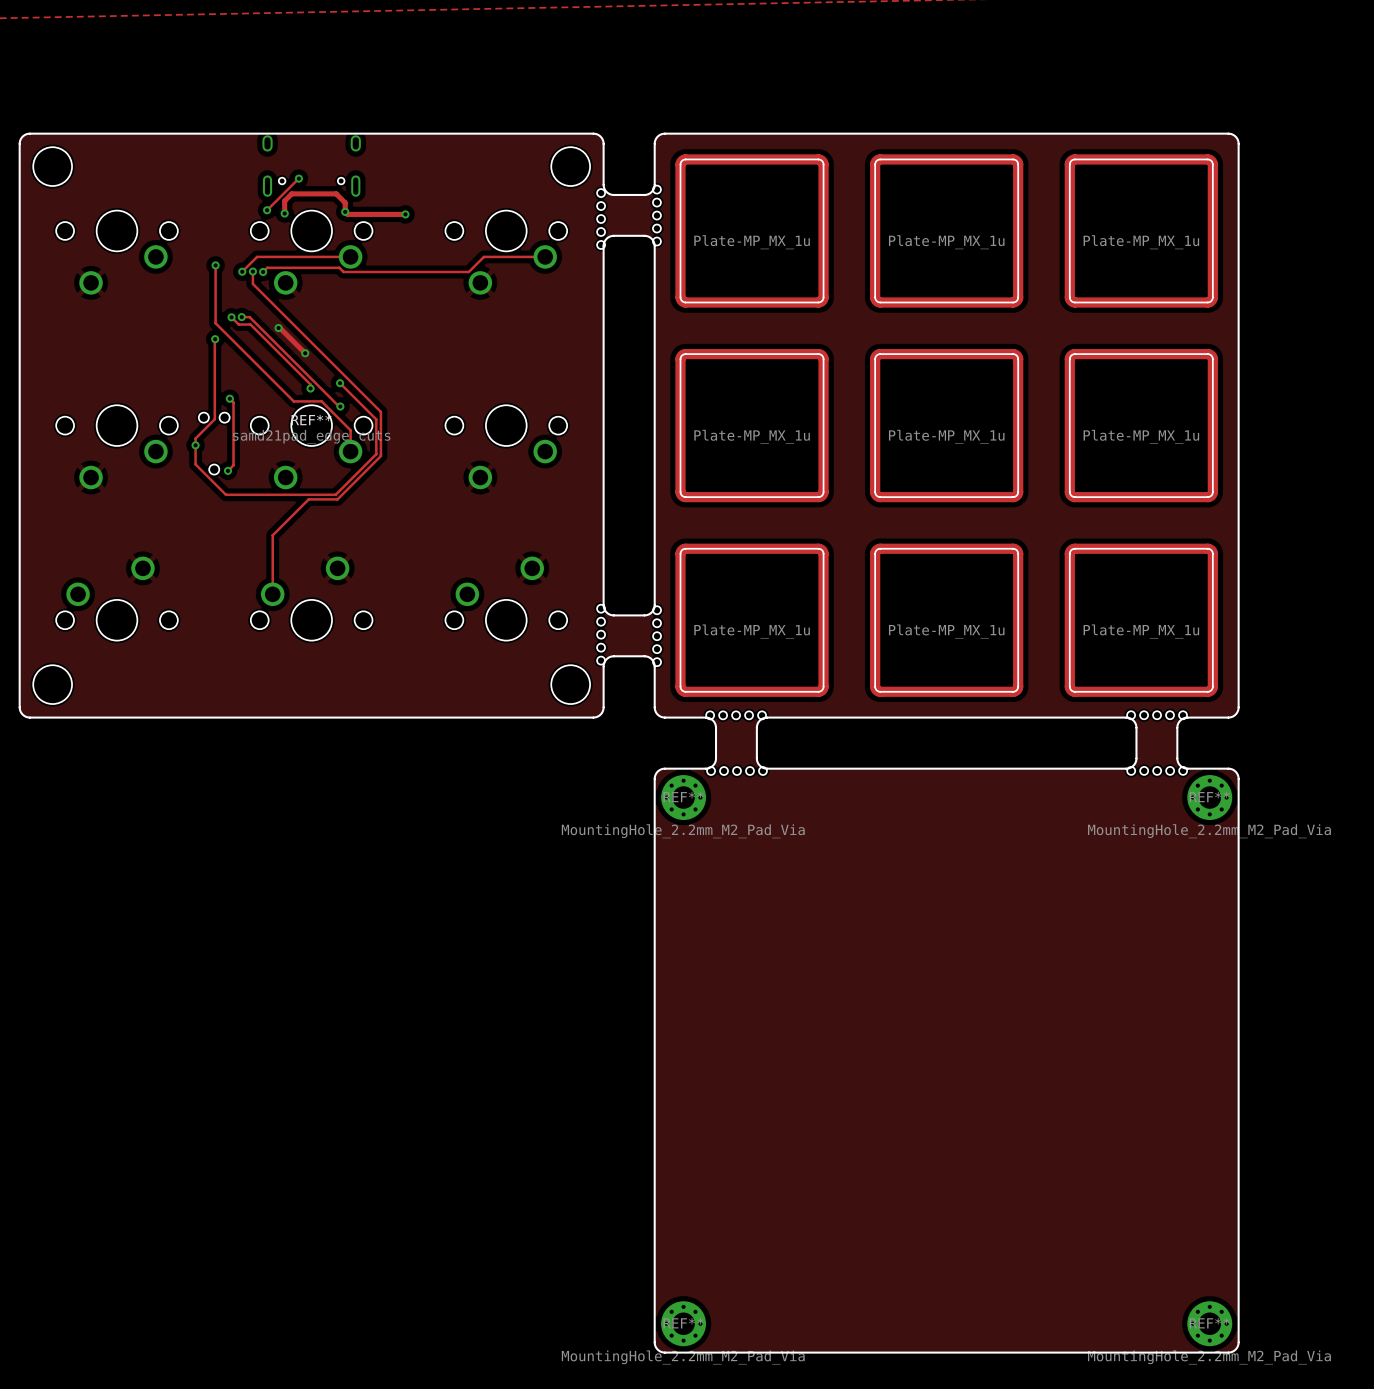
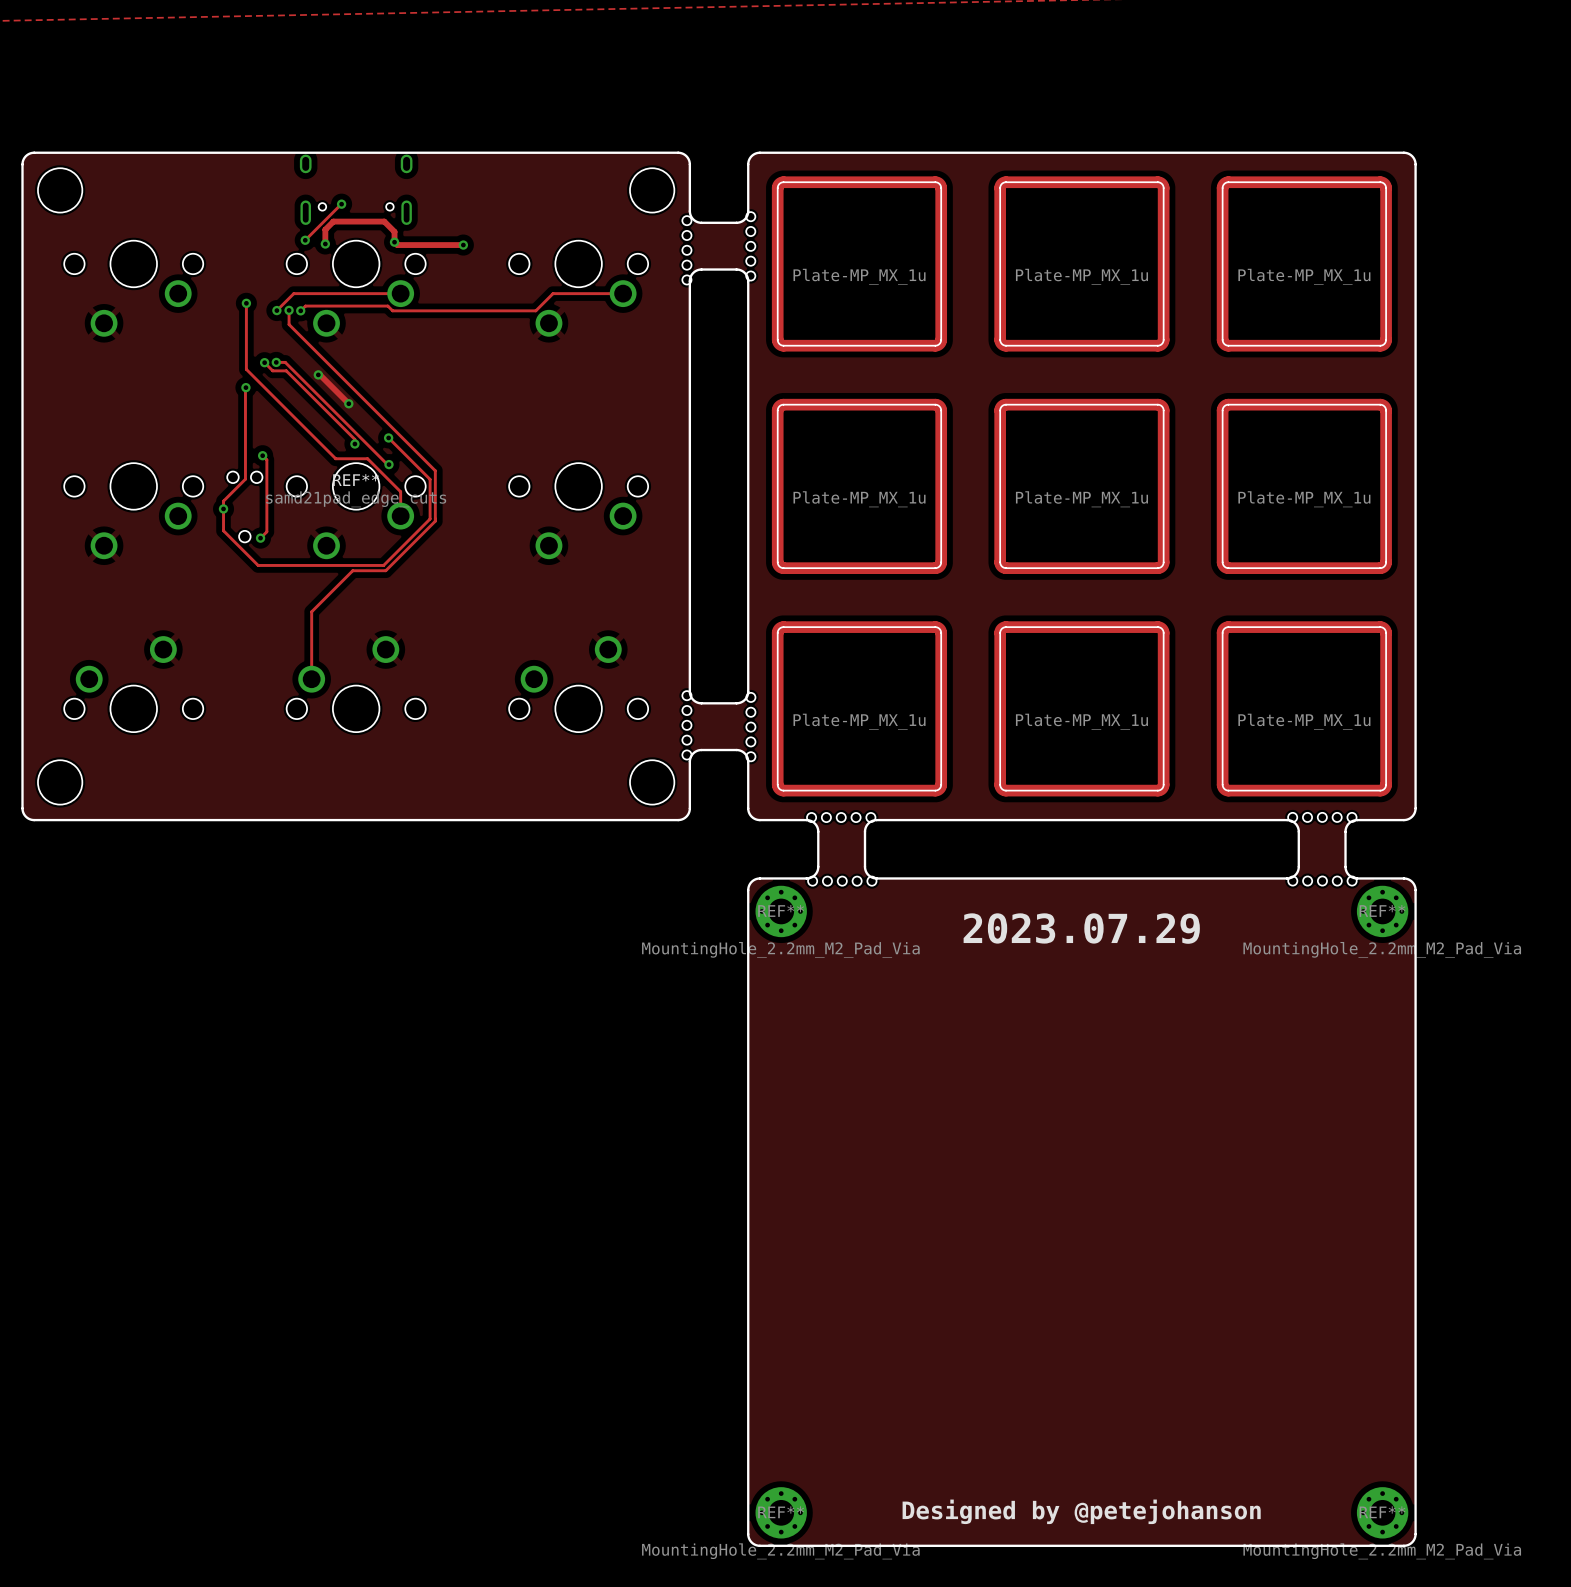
text: none -> 2023.07.29 (1081, 928)
text: none -> Designed by @petejohanson (1081, 1511)

